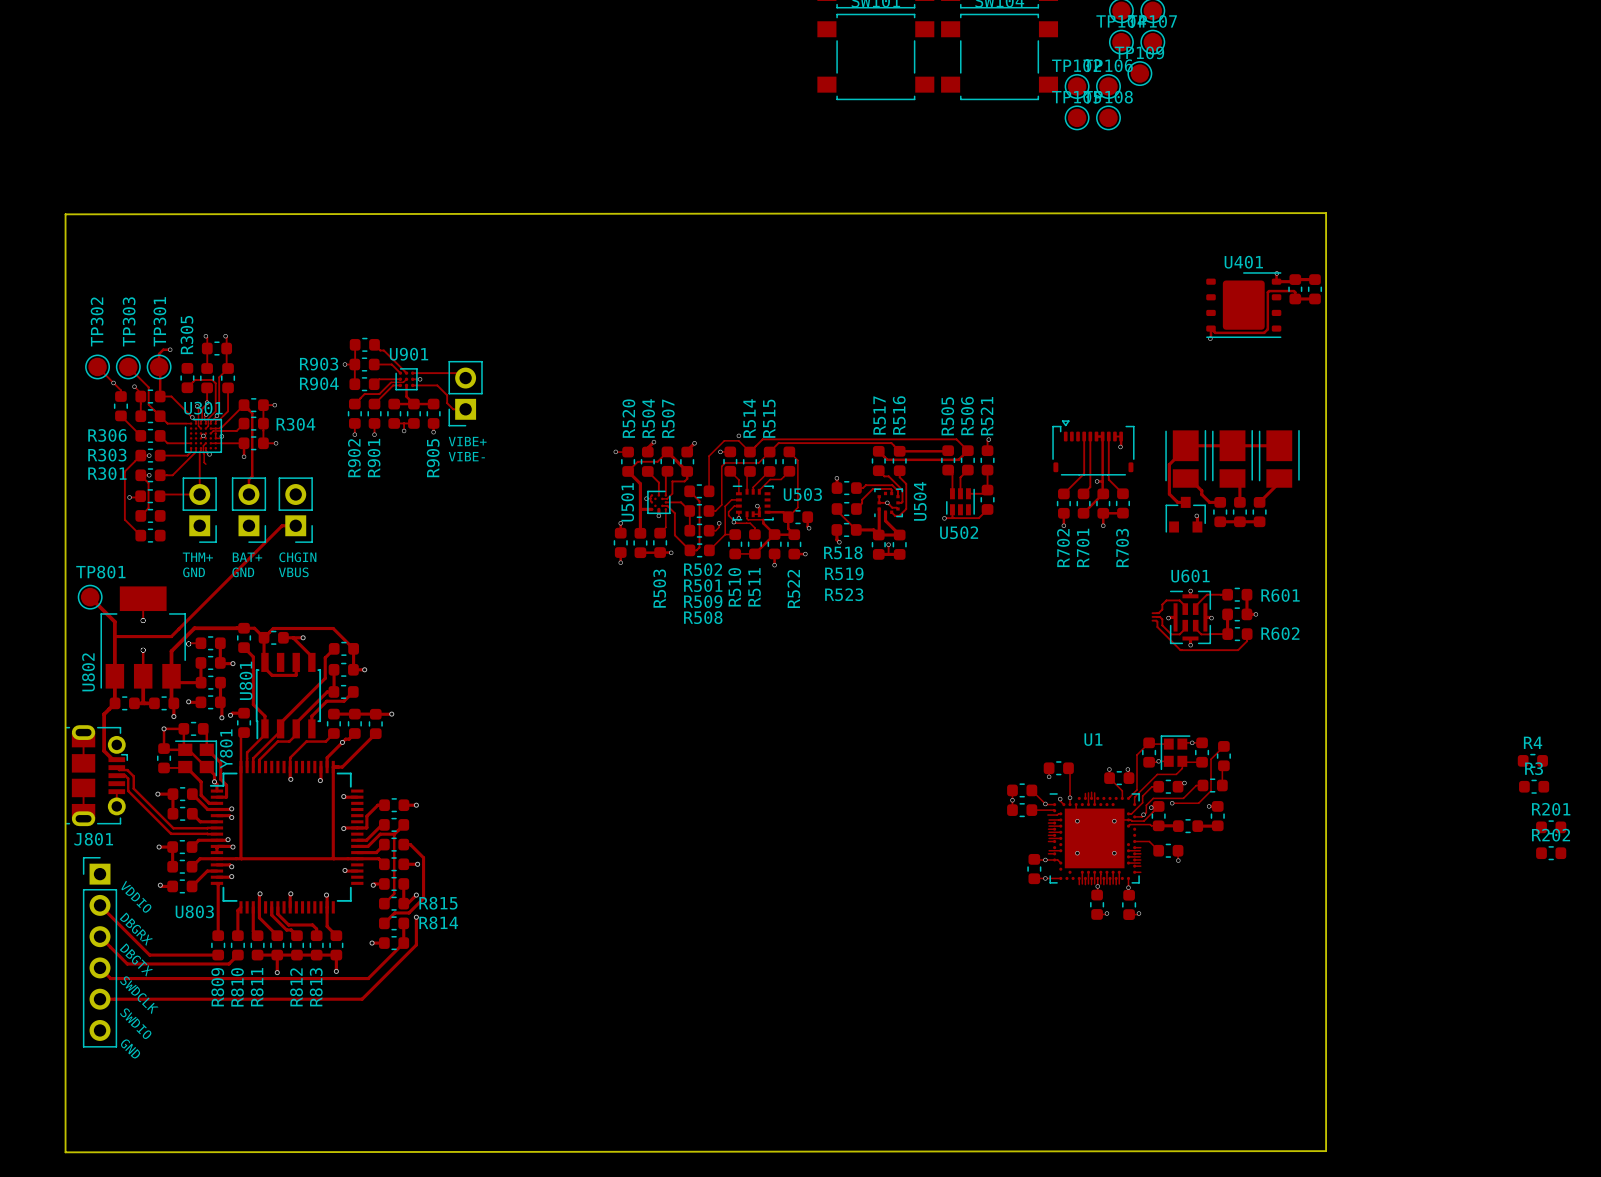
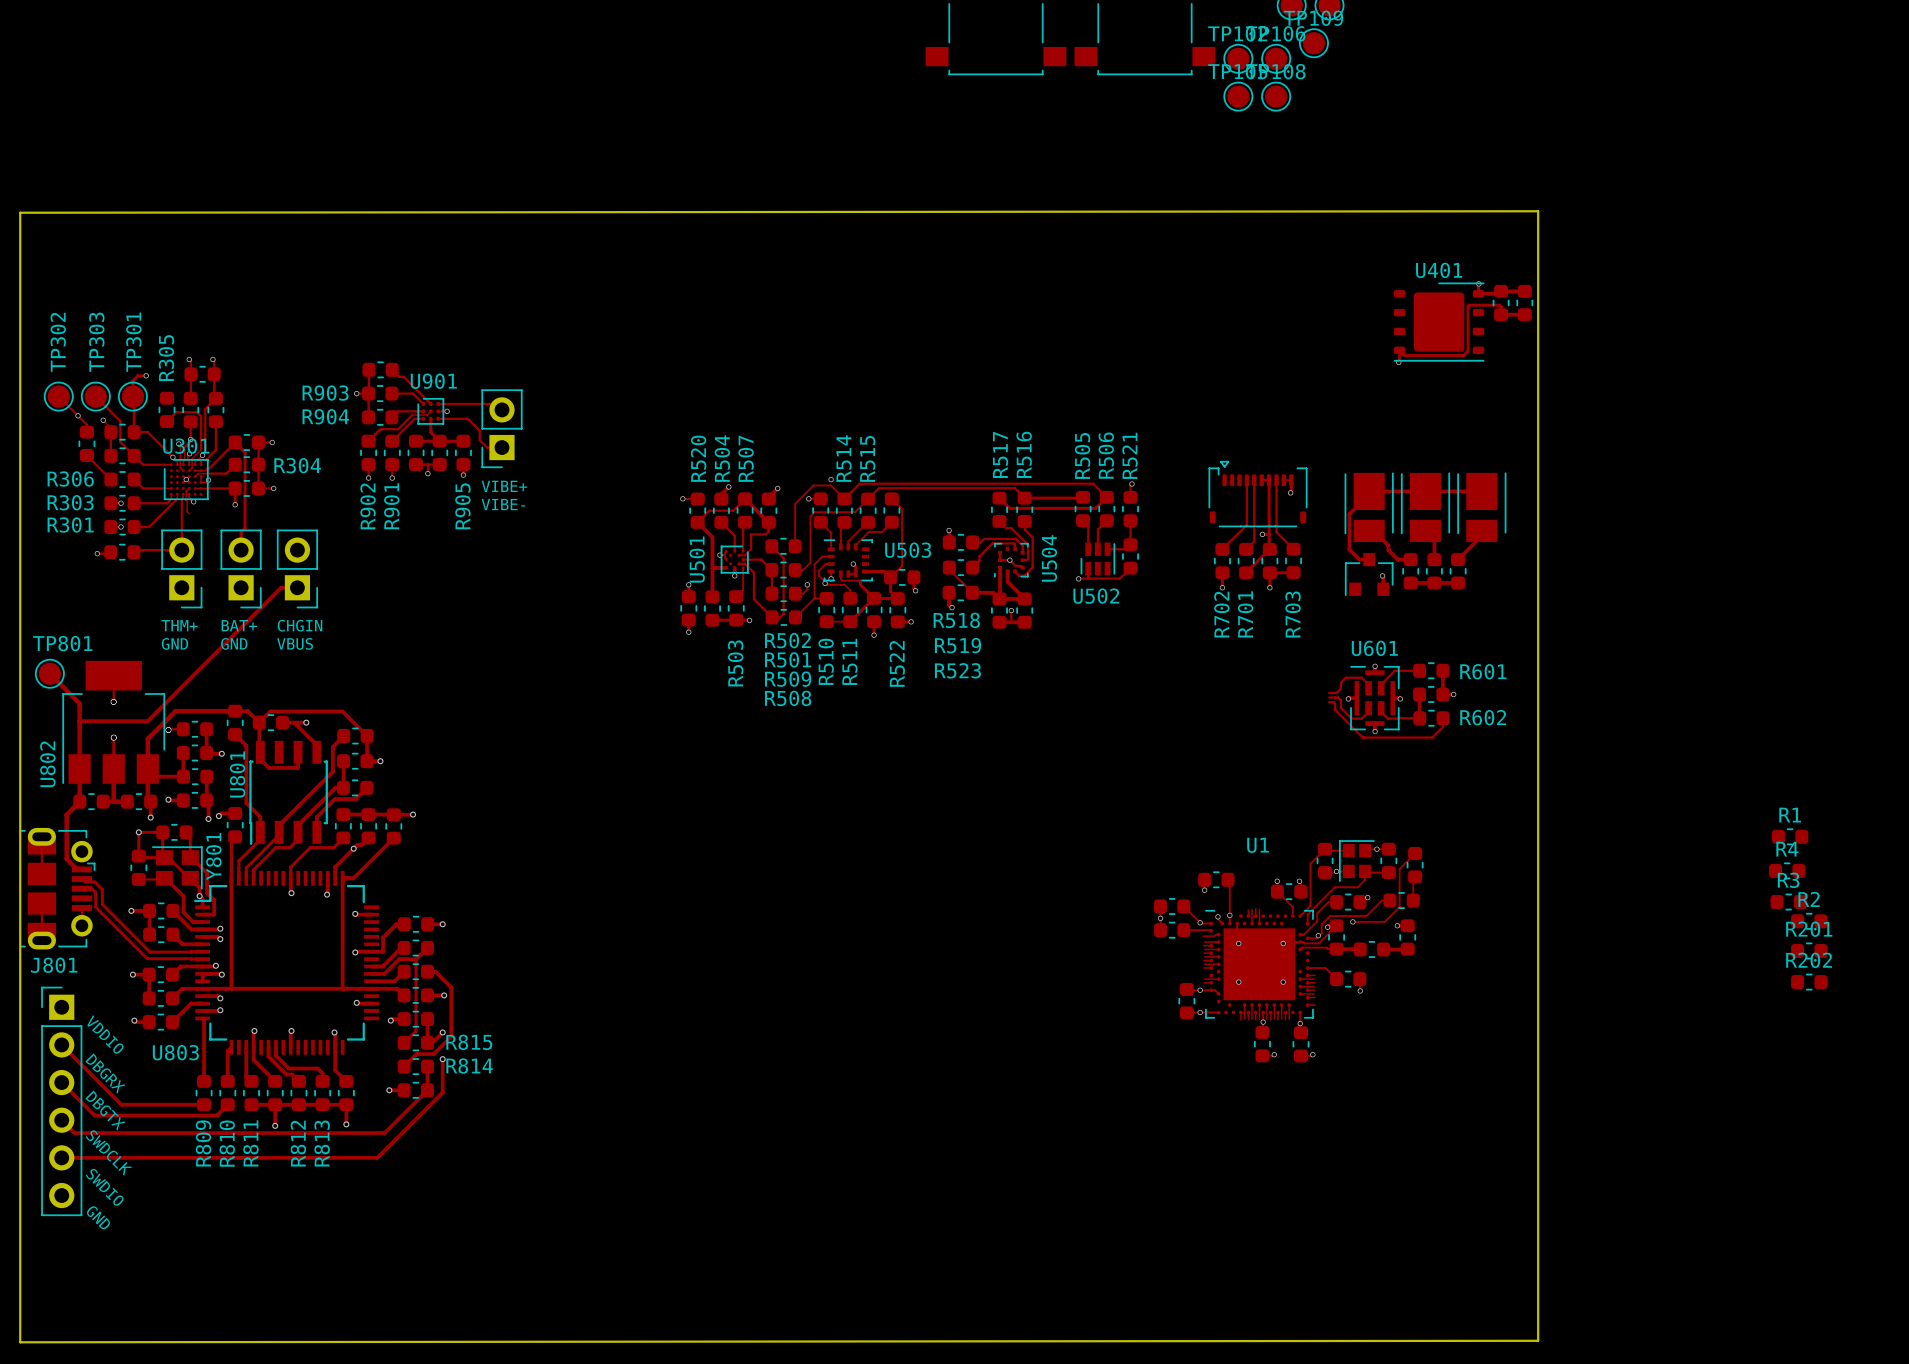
track: (140, 455) (124, 471) (124, 519) (140, 535) -> none
track: (140, 475) (148, 483) (148, 508) (140, 515) -> none
part: (150, 515) -> none
part: (150, 535) -> none
R1: none -> (1790, 836)
R2: none -> (1809, 921)

